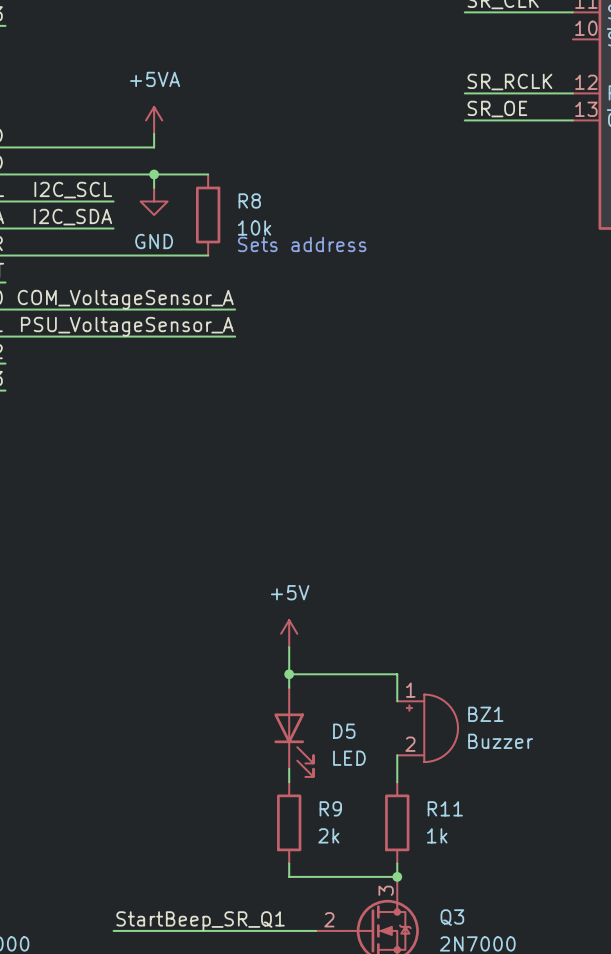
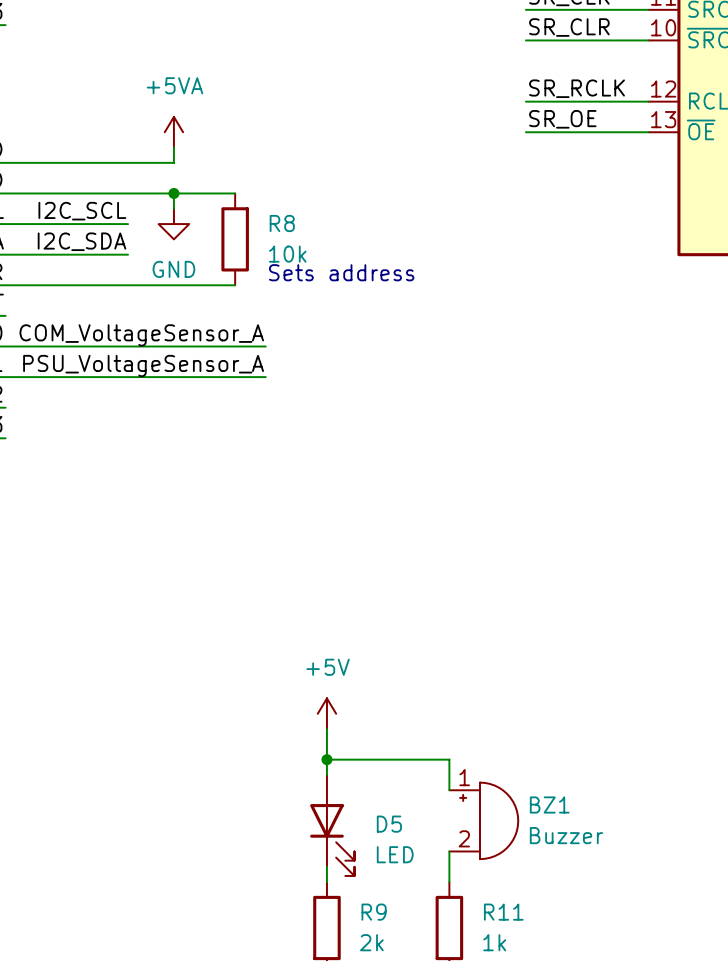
label: none -> SR_CLR (569, 27)
wire: none -> (525, 40) (648, 40)

